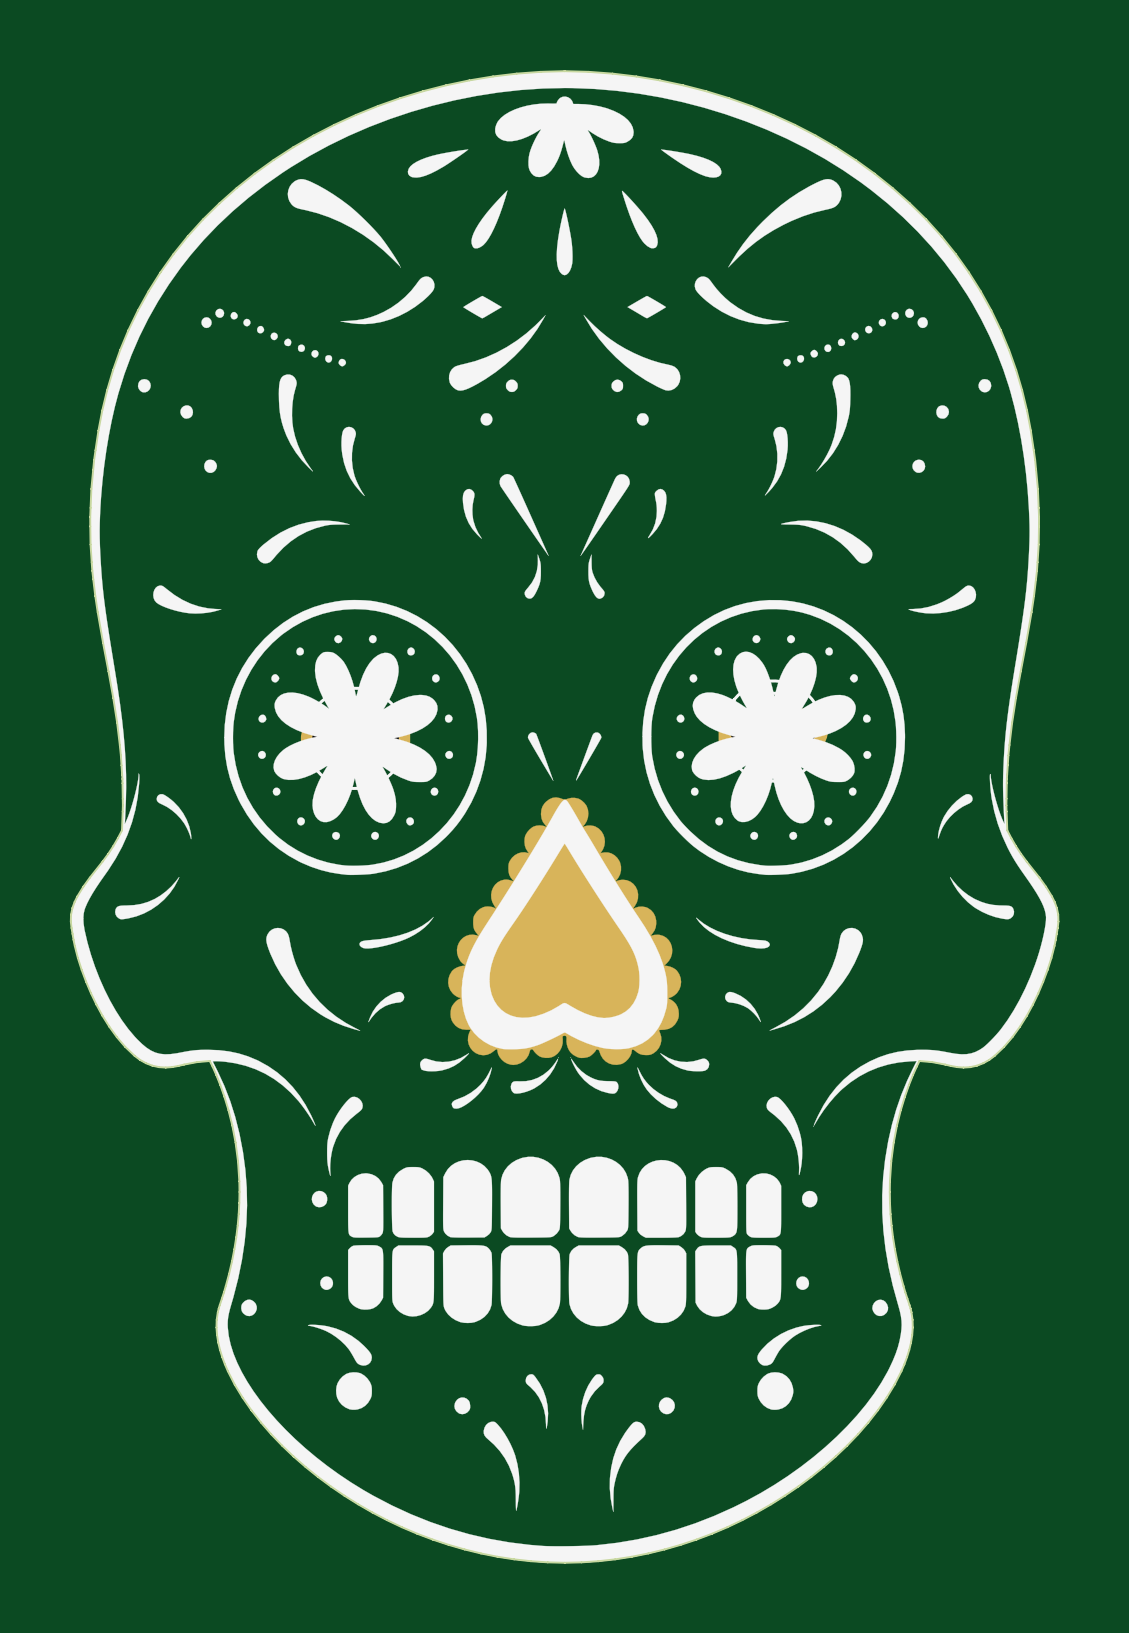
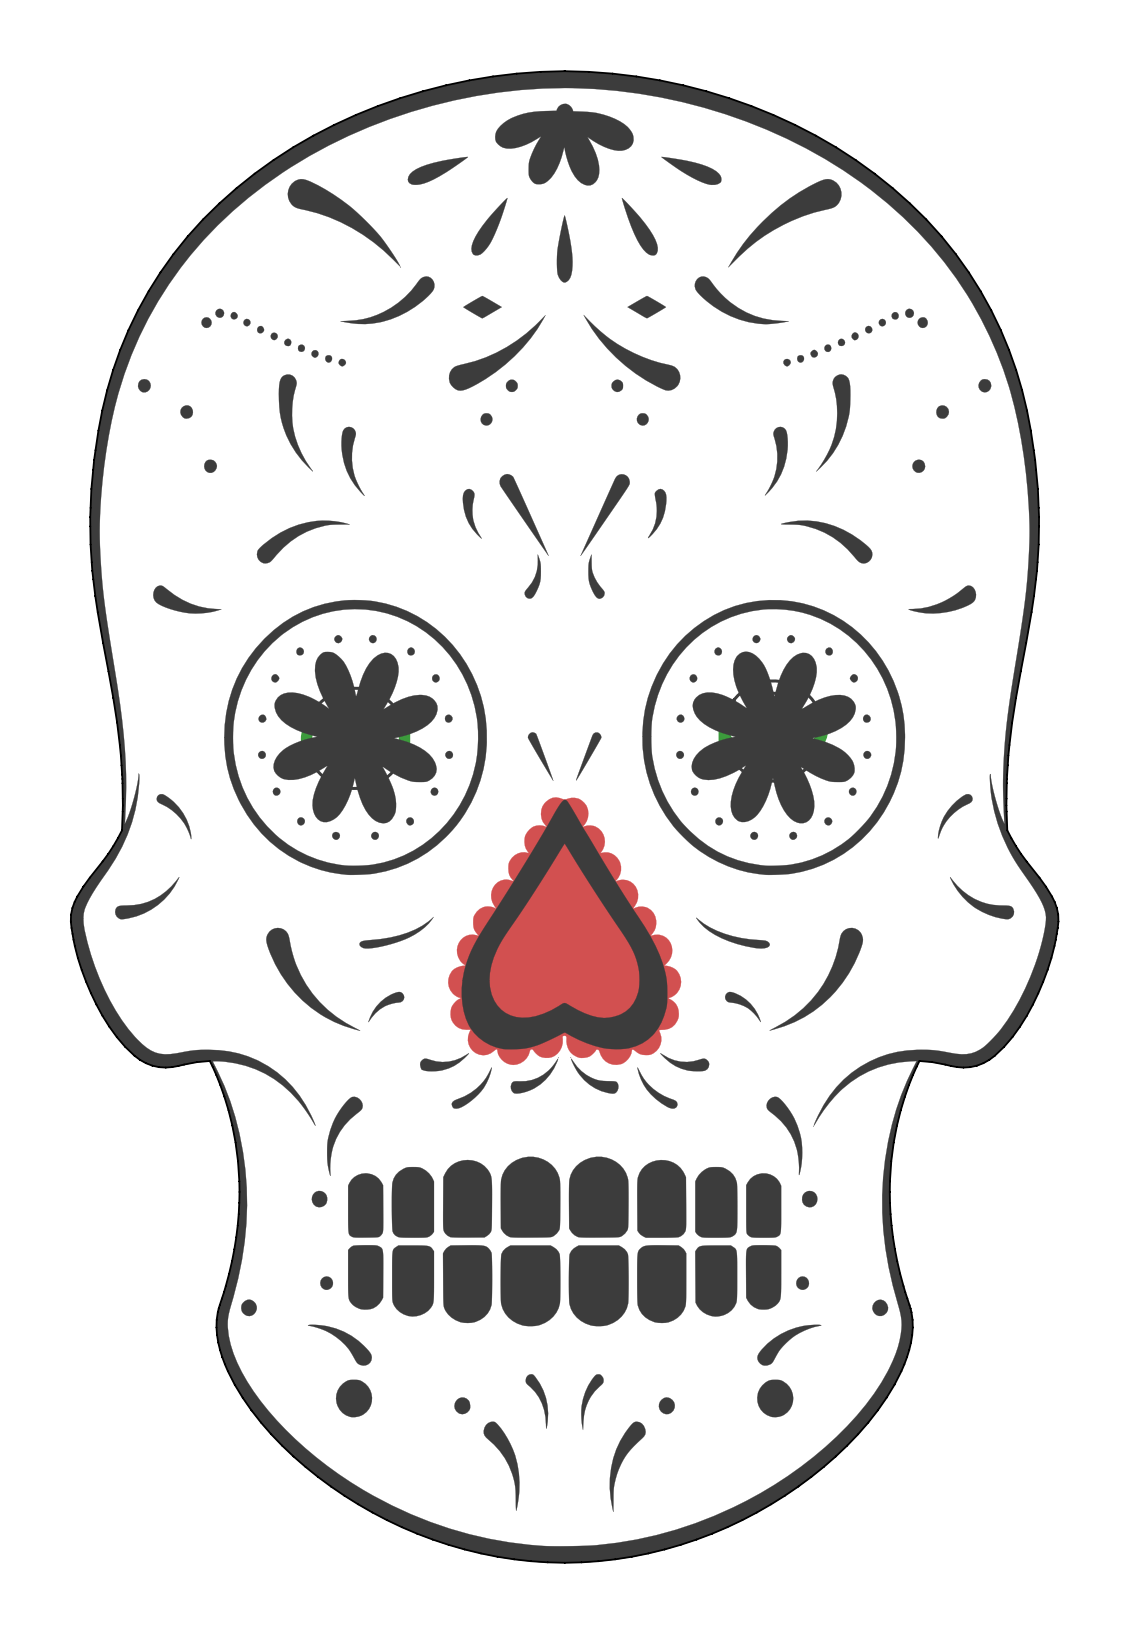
drawing shape: [70, 71, 1059, 1564] -> [70, 71, 1059, 1564]

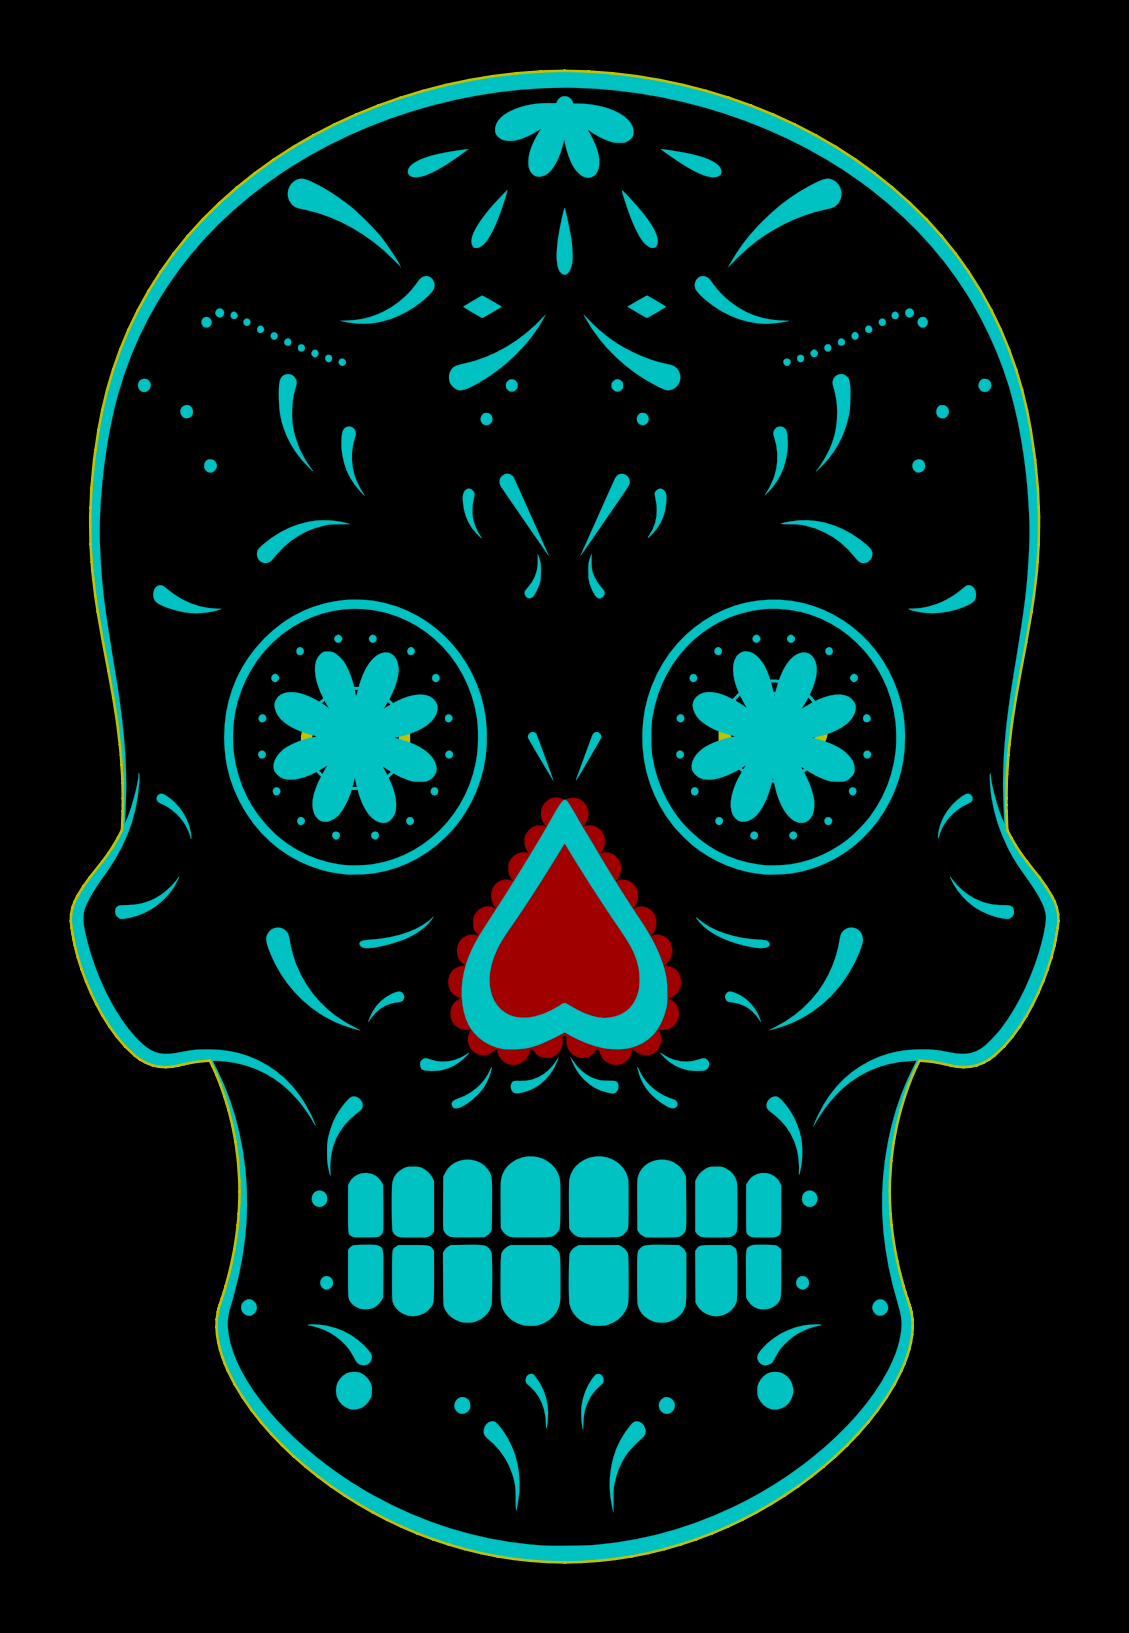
drawing: none -> [69, 69, 1060, 1564]
drawing: [70, 71, 1059, 1564] -> none

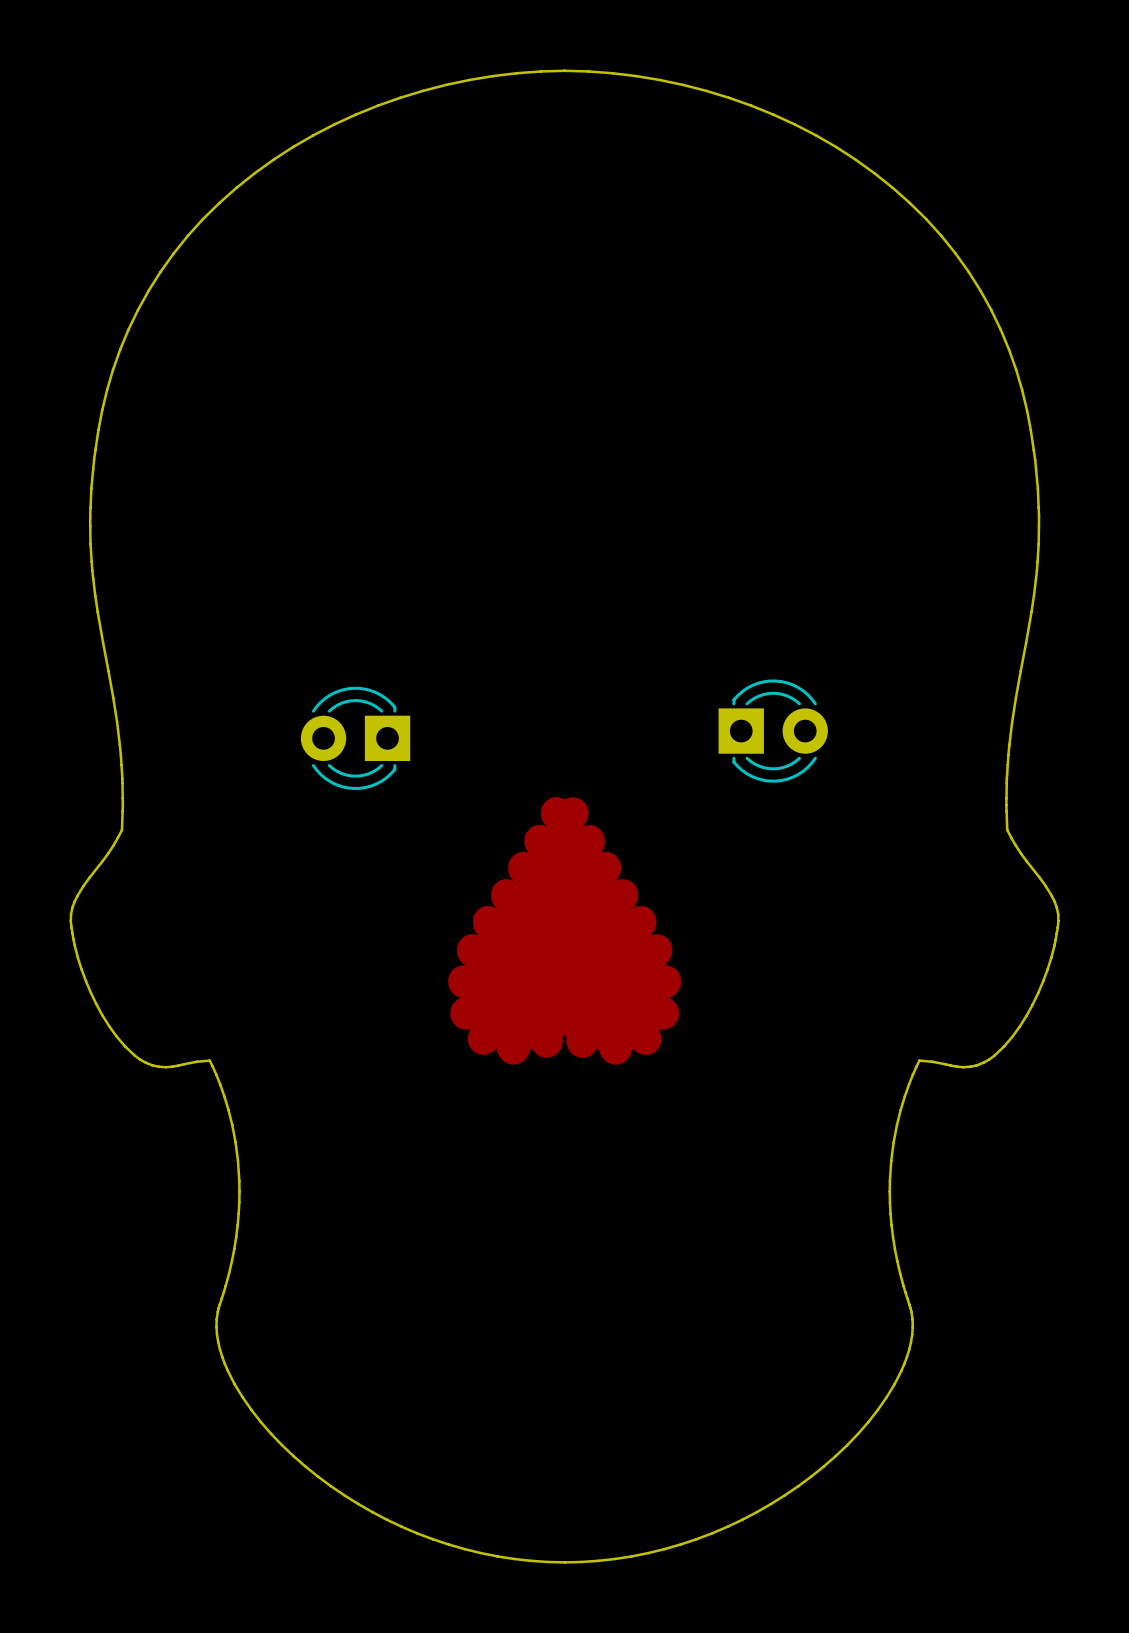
drawing: [70, 71, 1059, 1563] -> none
part footprint: [448, 797, 682, 1066] -> [448, 796, 682, 1065]

